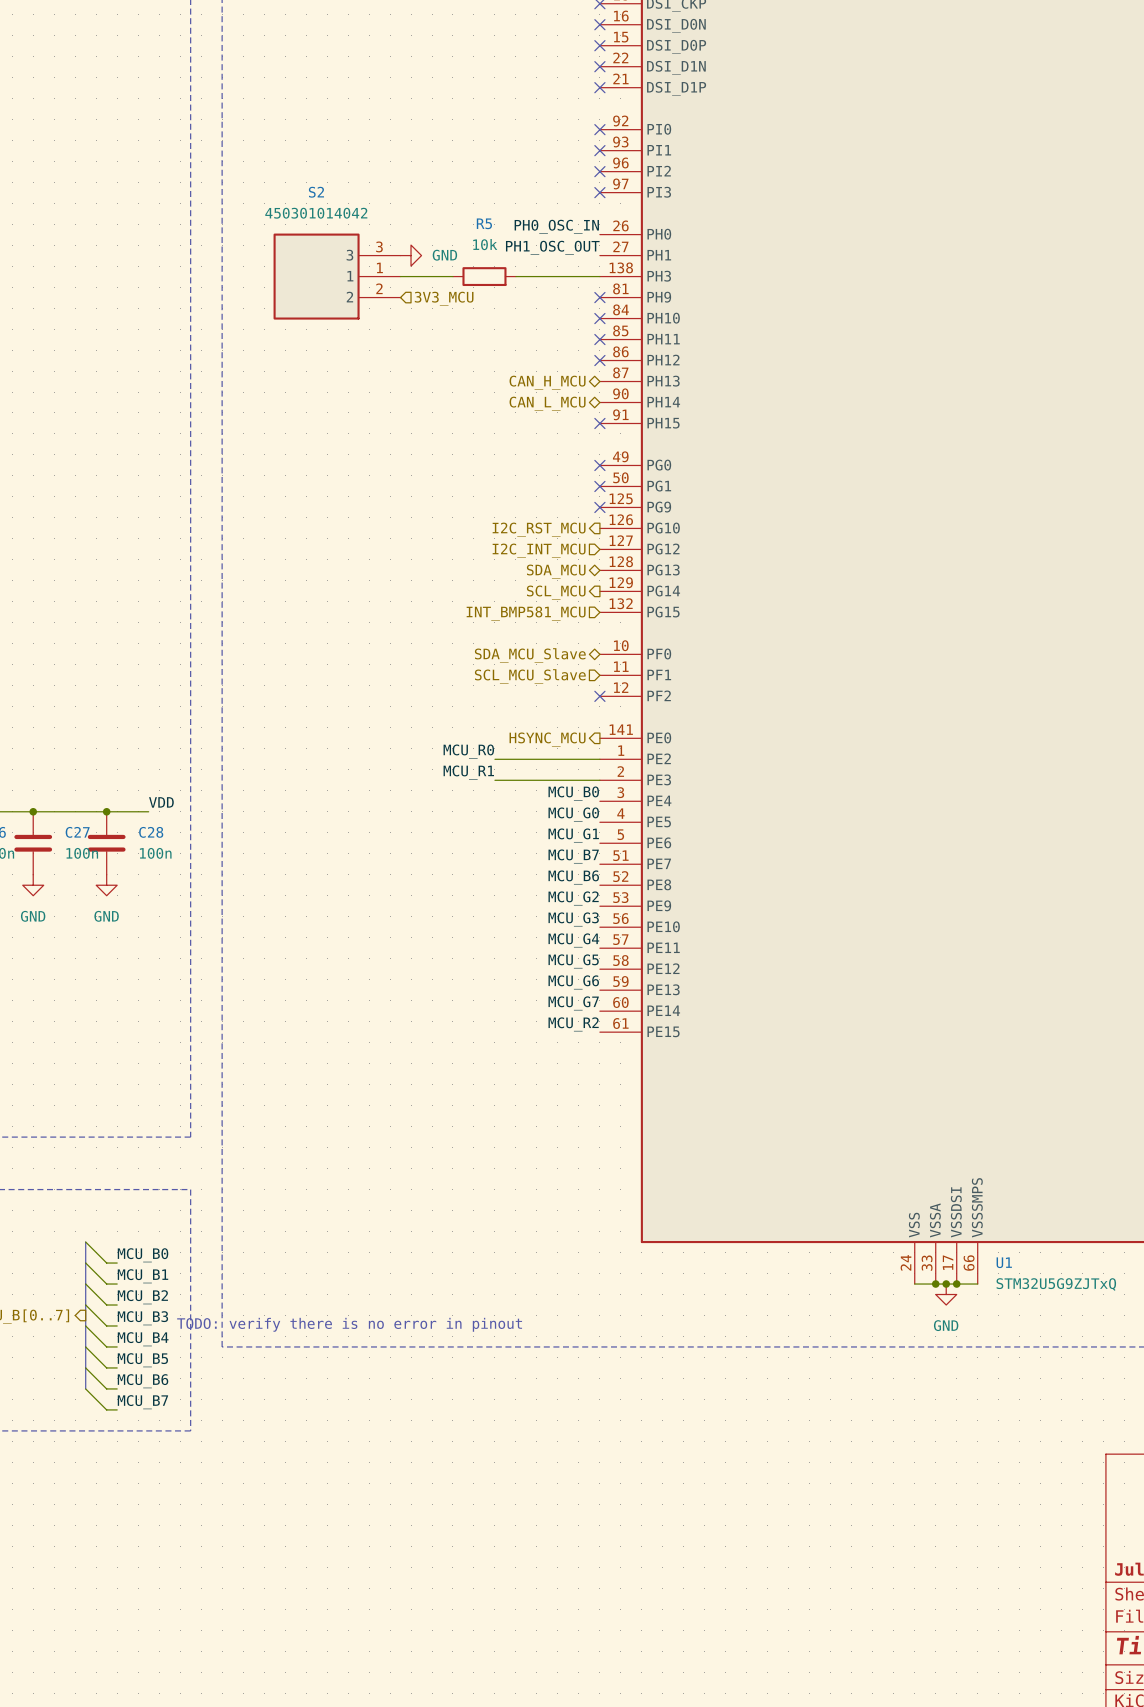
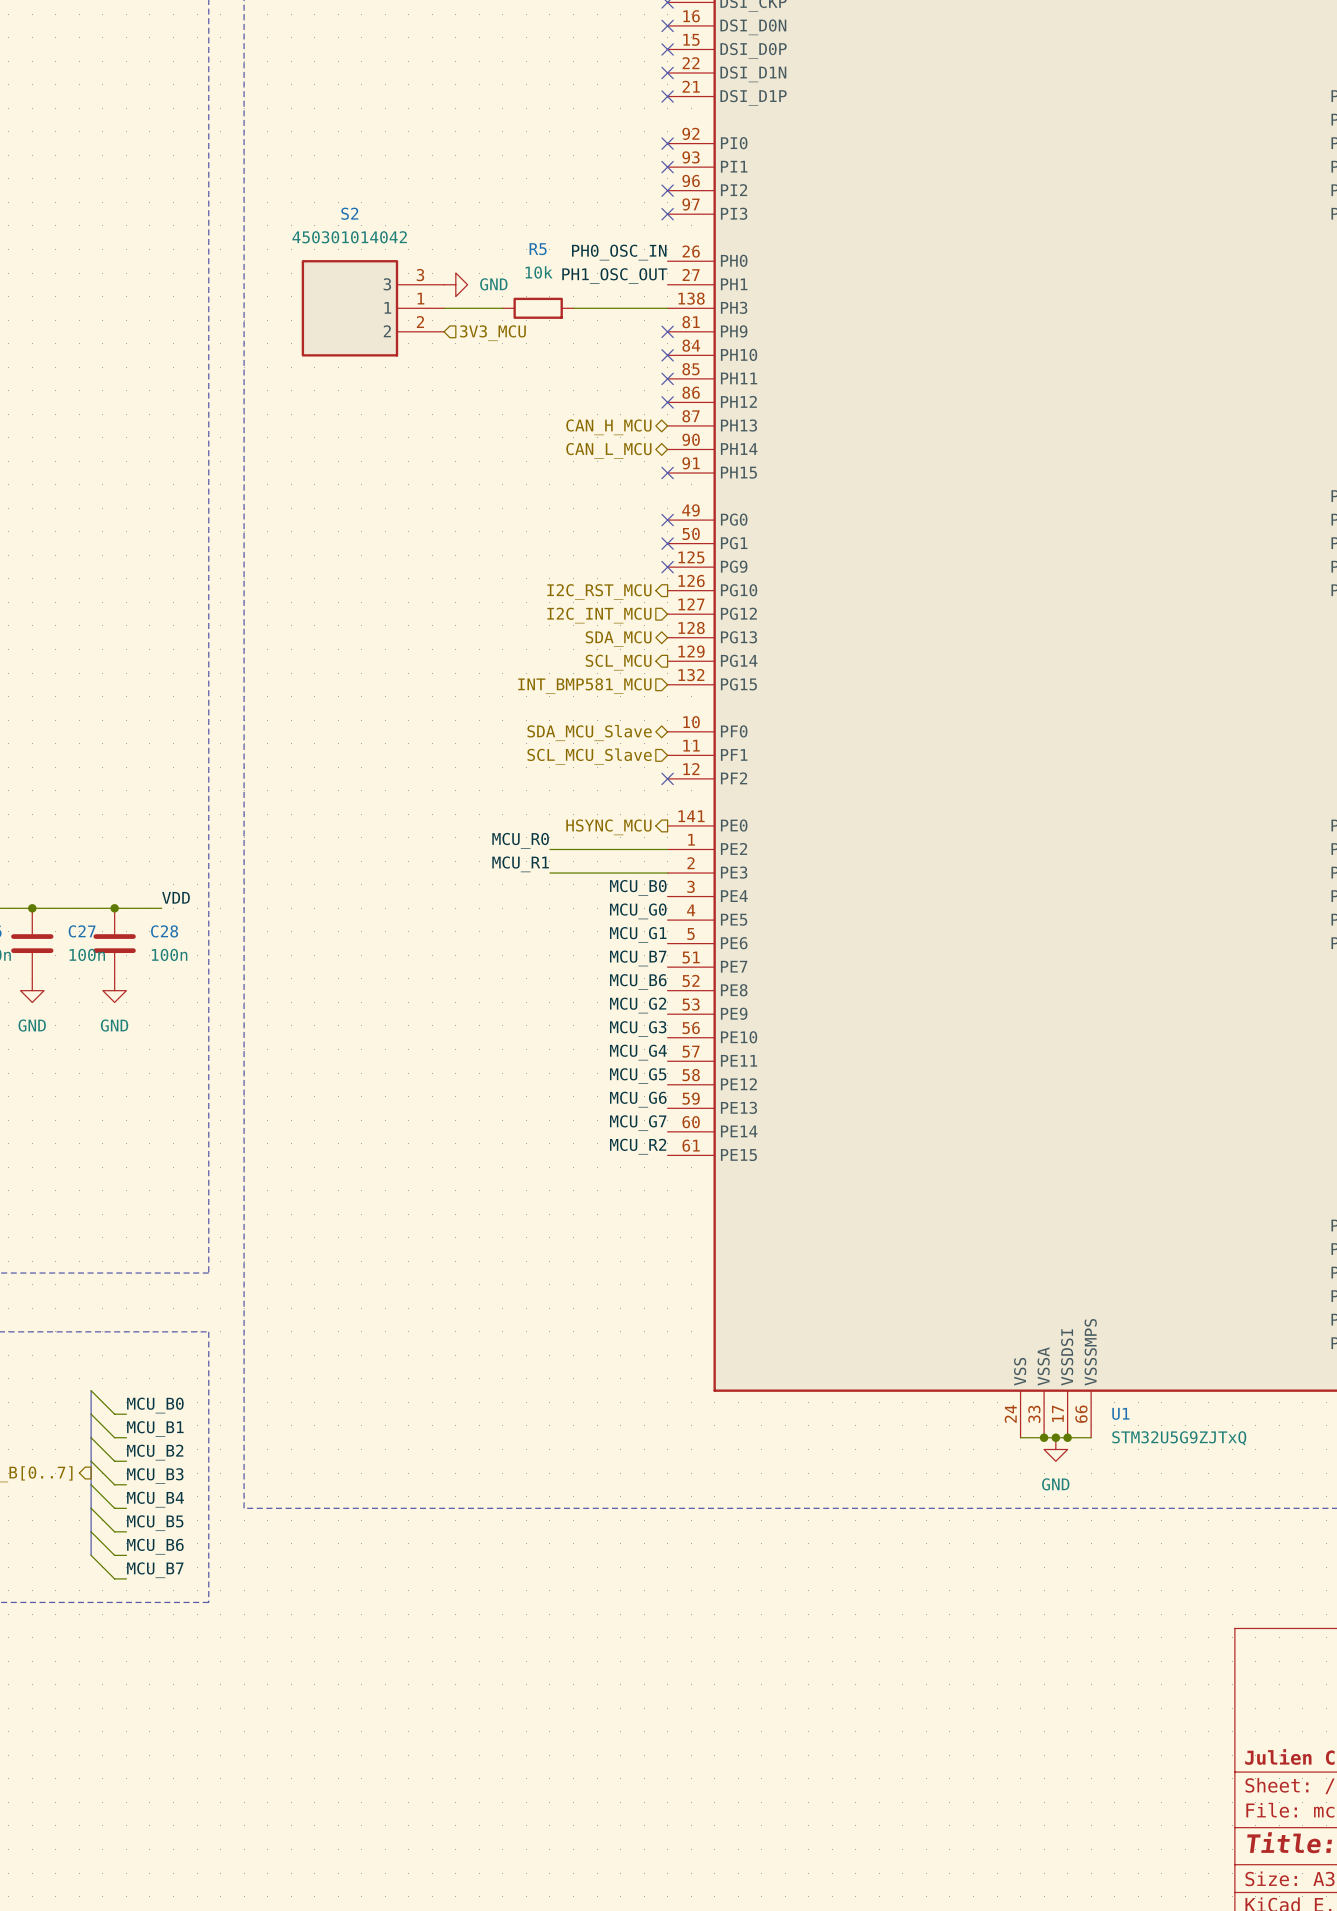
text: TODO: verify there is no error in pinout (349, 1324) -> none

